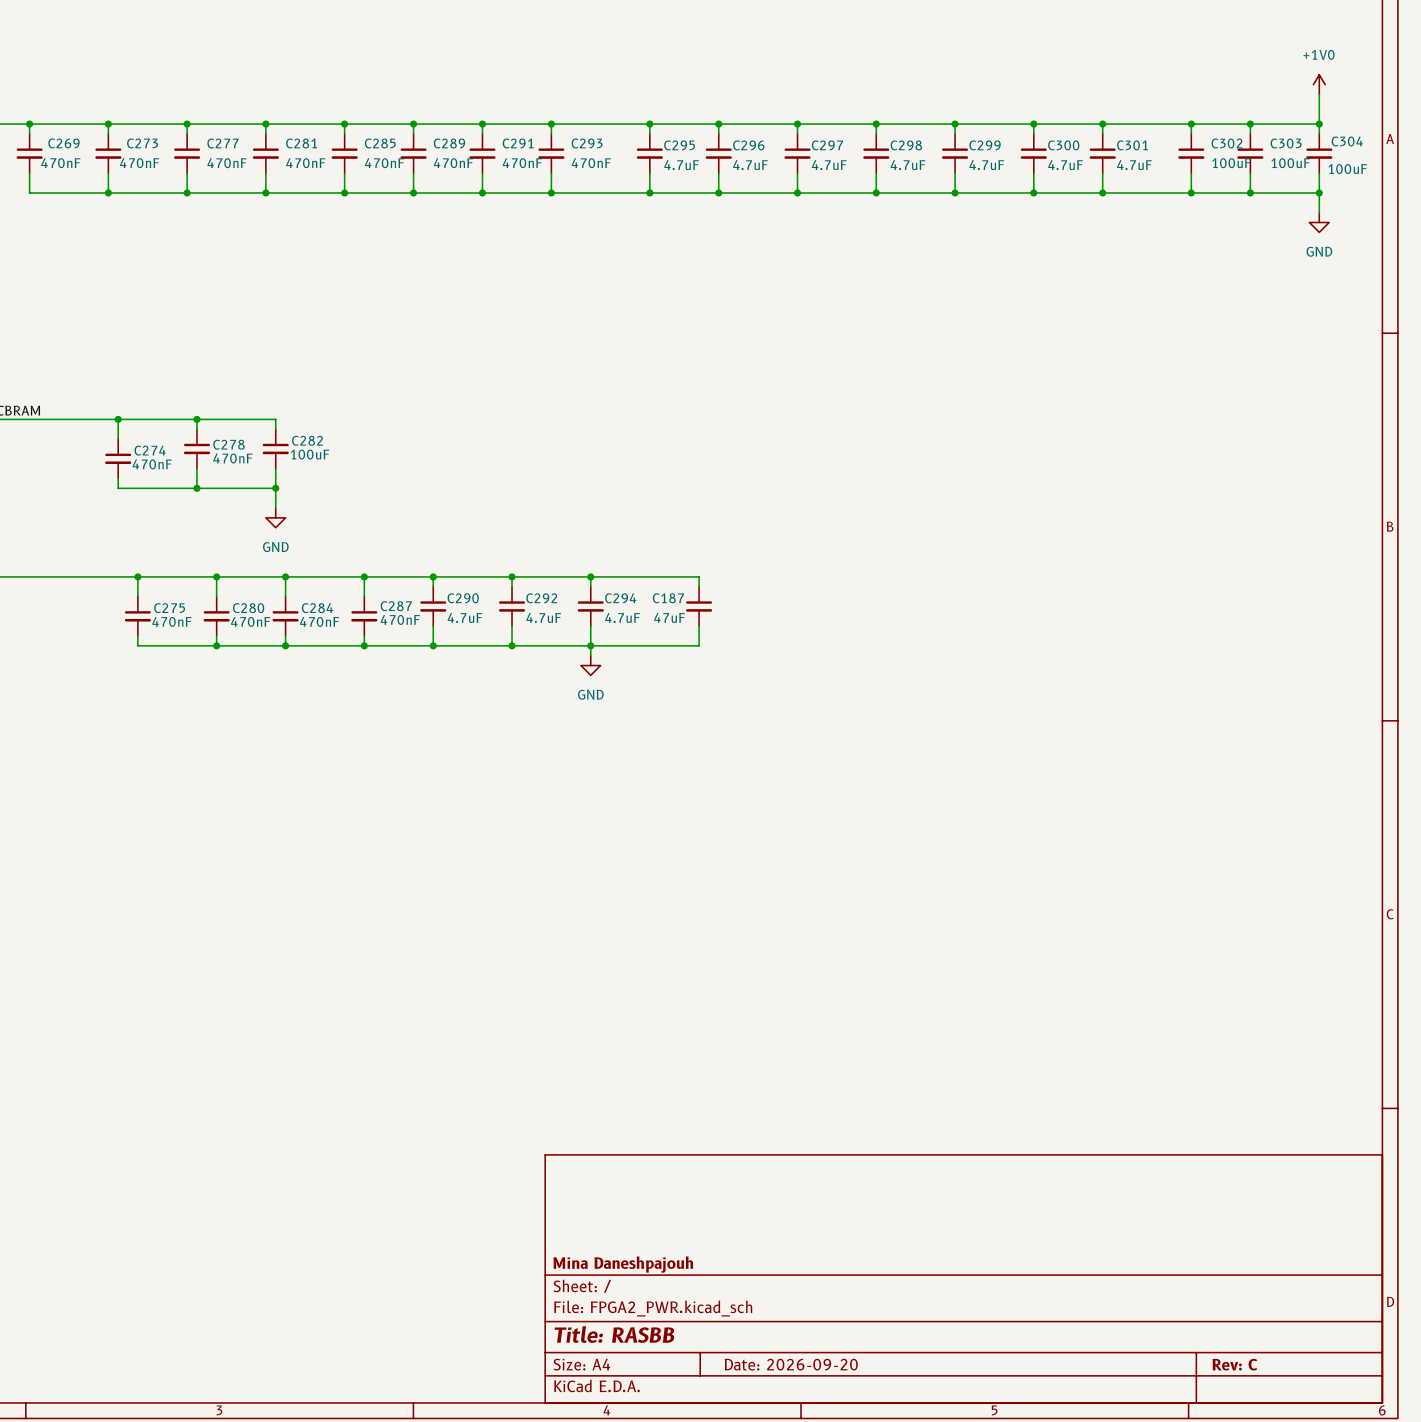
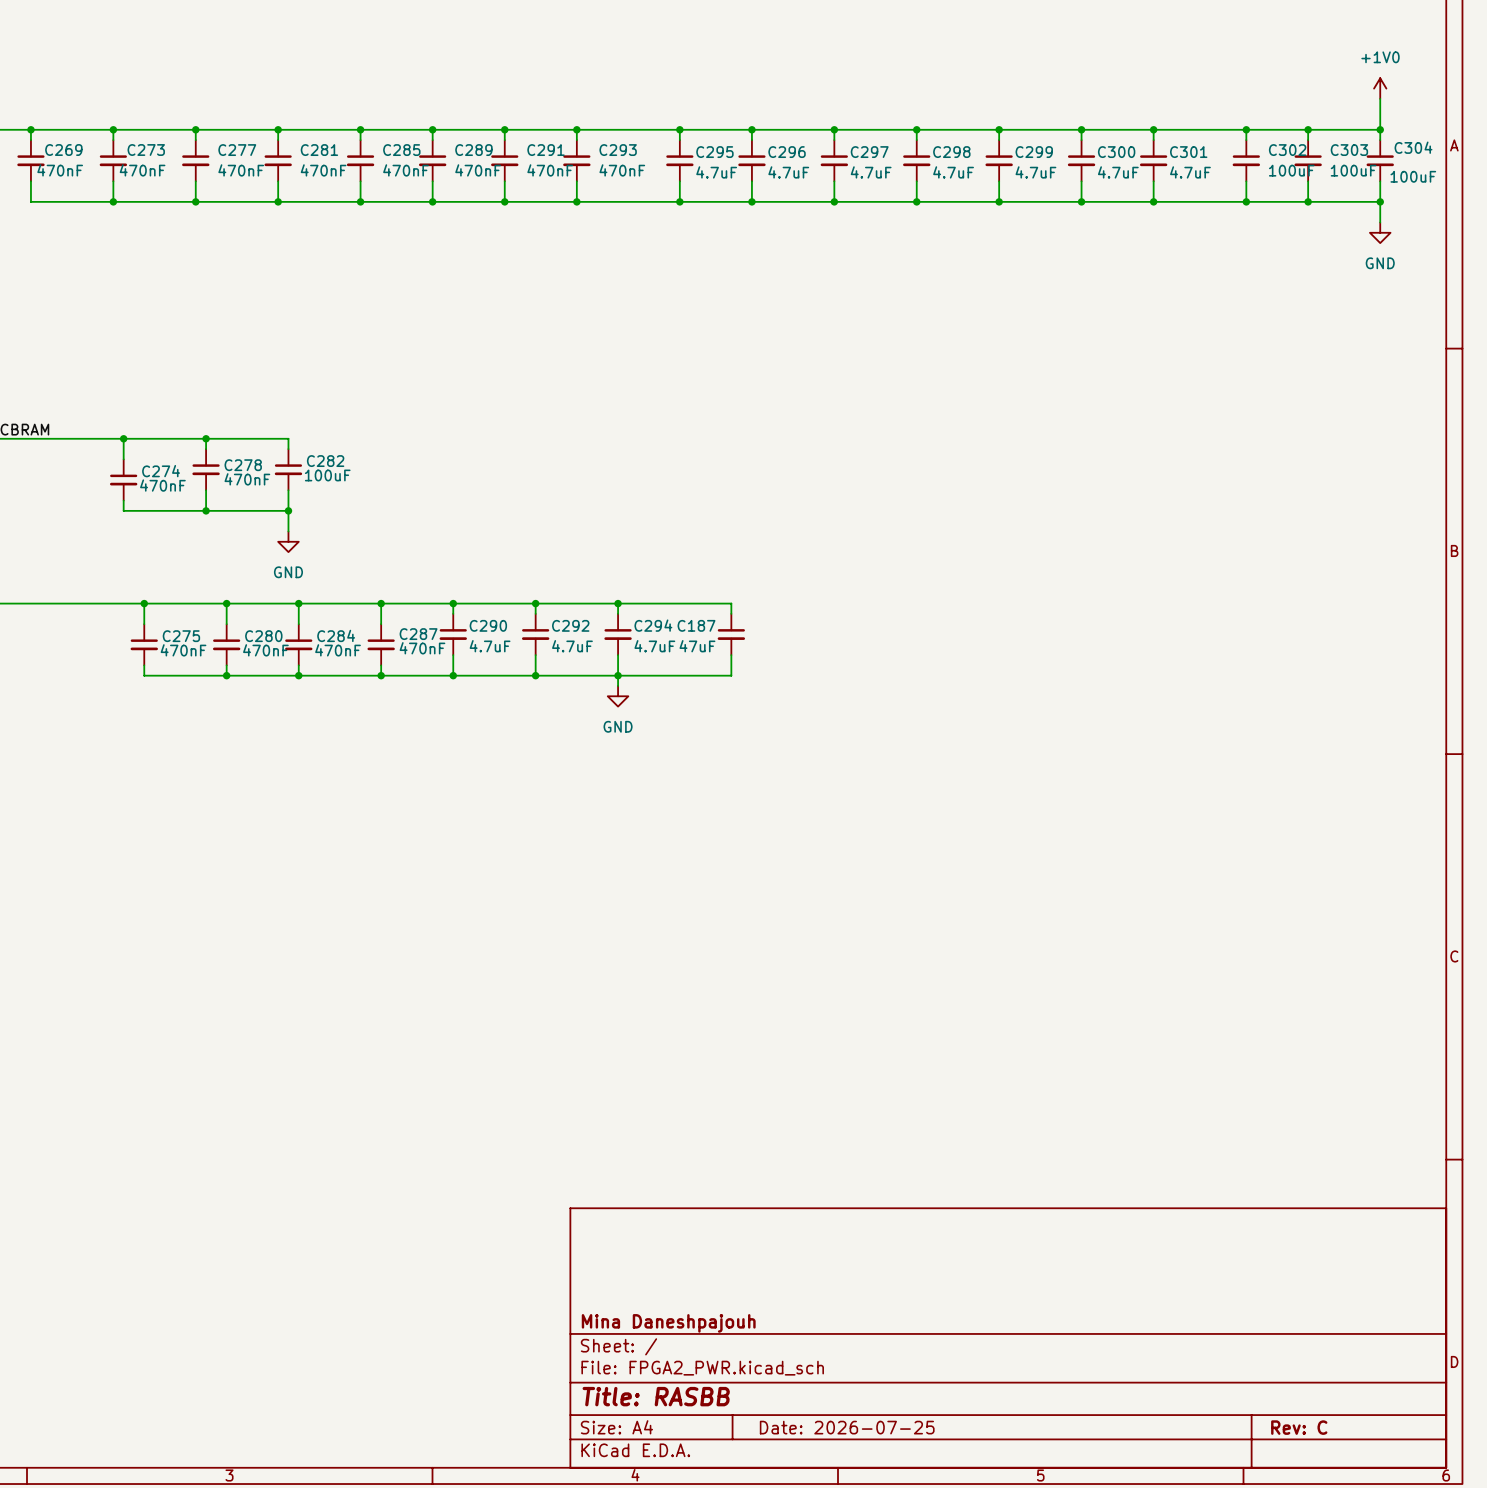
title block: Date: 2026-09-20 (791, 1364) -> Date: 2026-07-25 (847, 1427)

